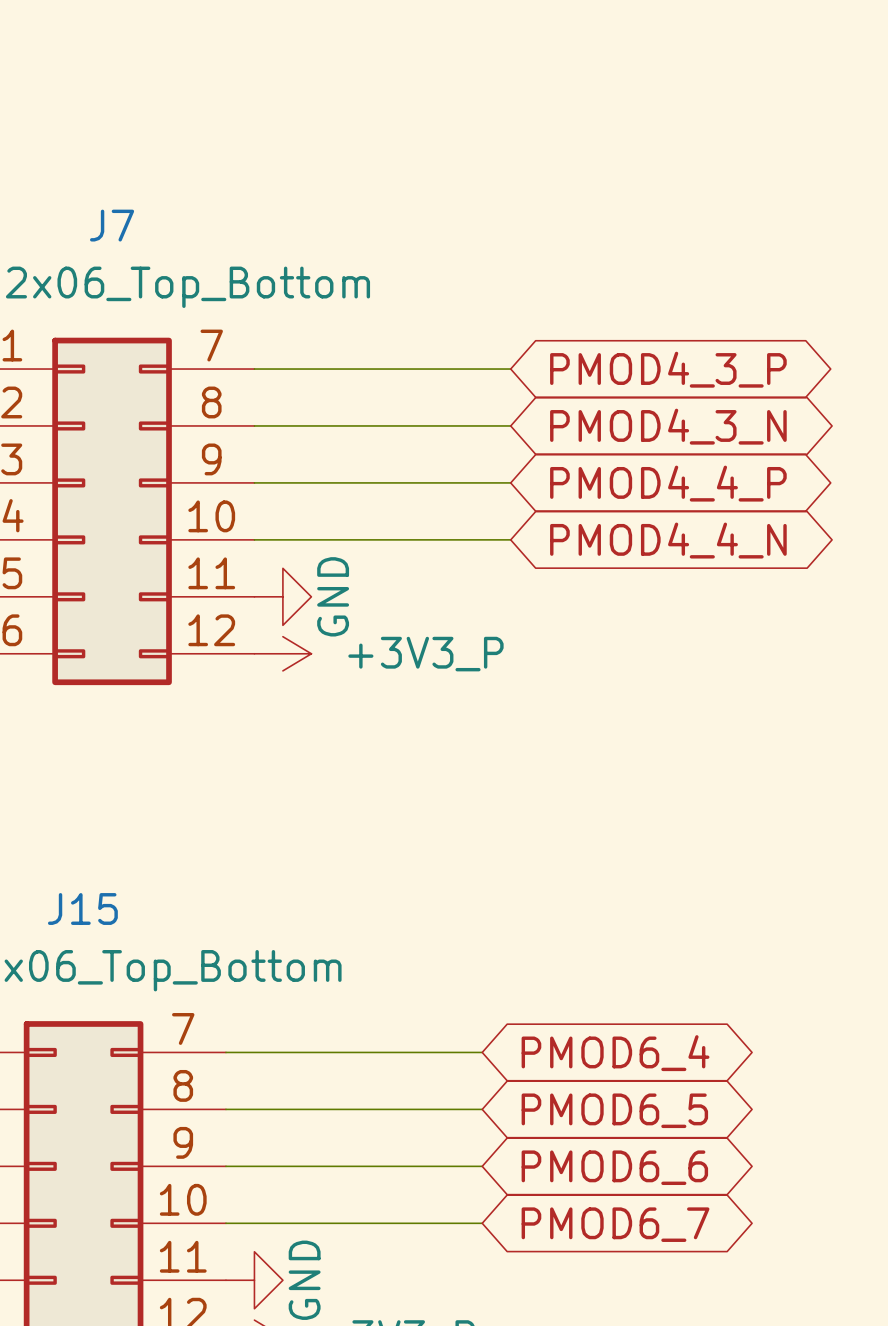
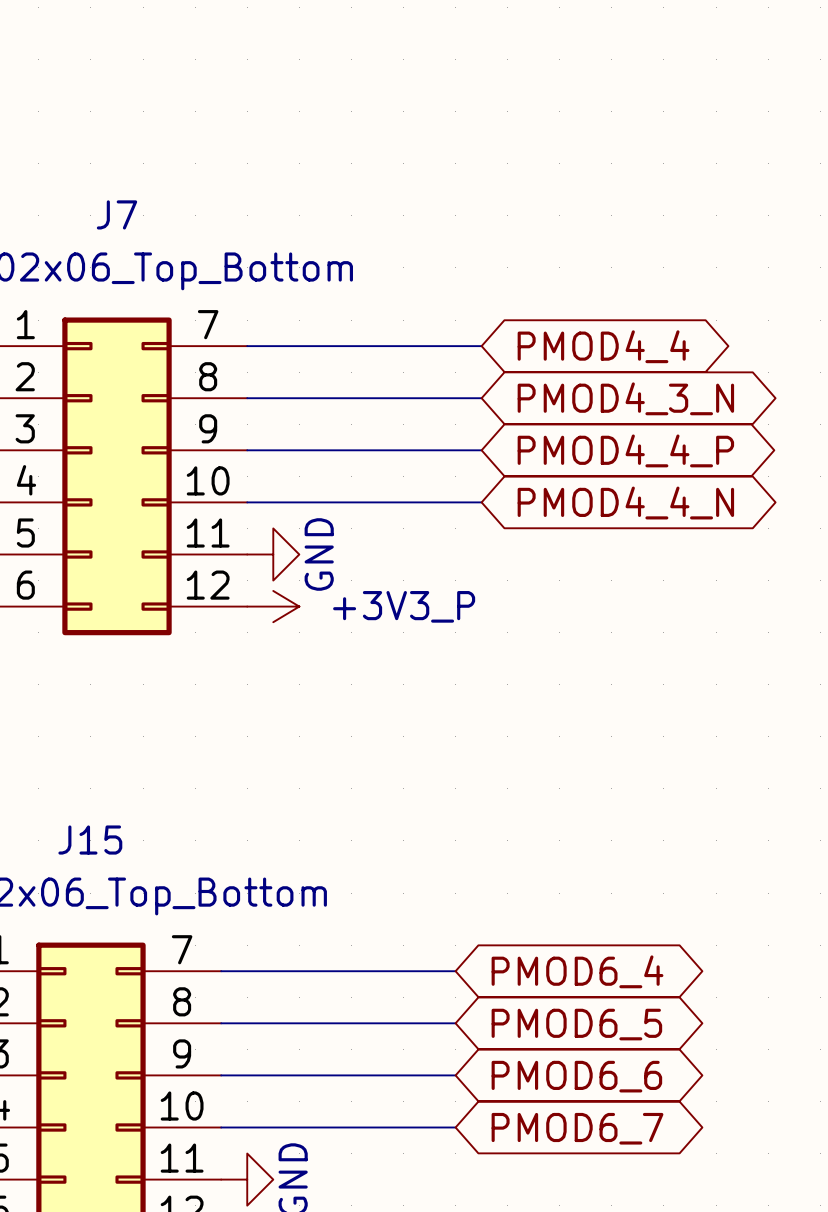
global label: PMOD4_3_P (668, 369) -> PMOD4_4 (603, 346)

